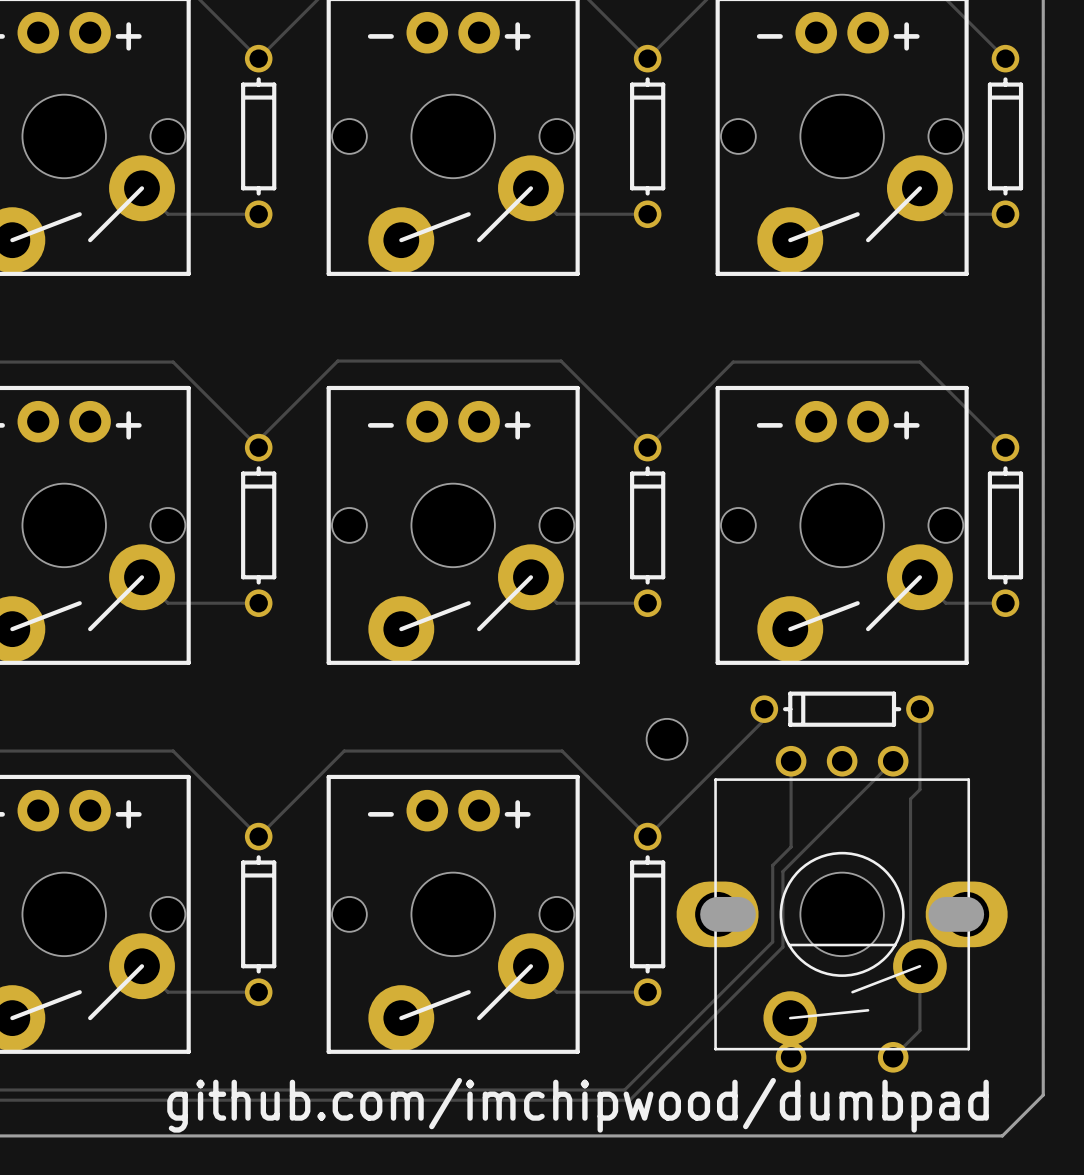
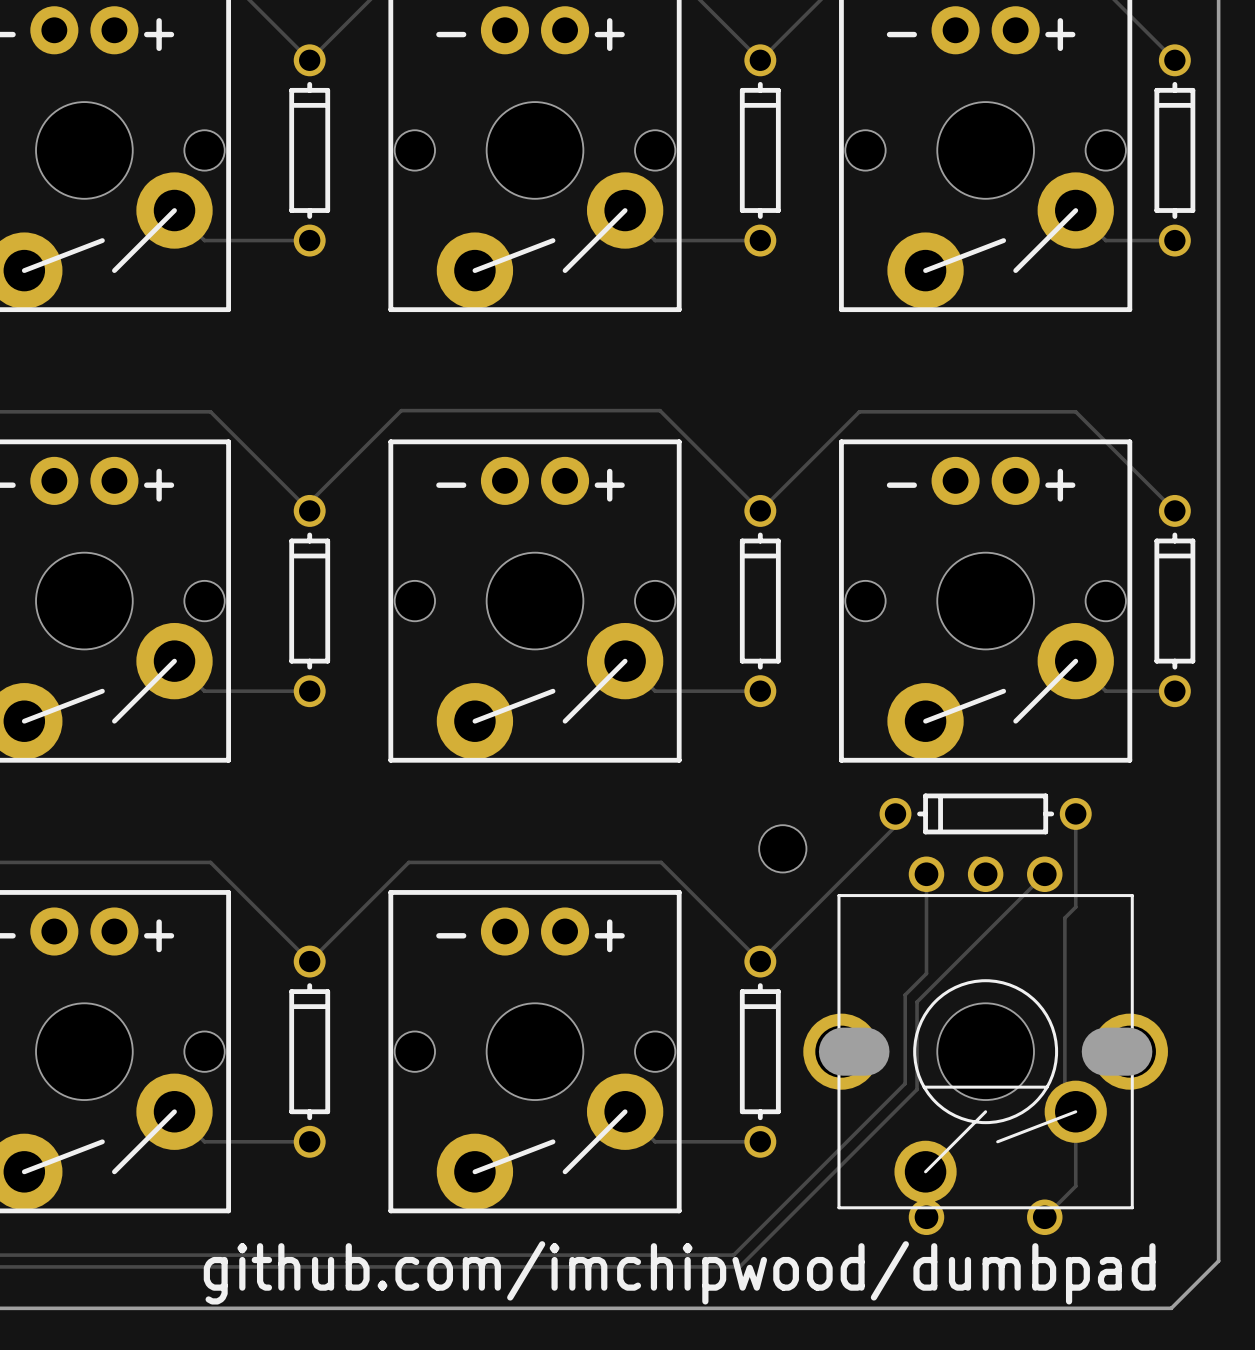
part footprint: [676, 745, 1008, 1073] -> [803, 856, 1168, 1235]

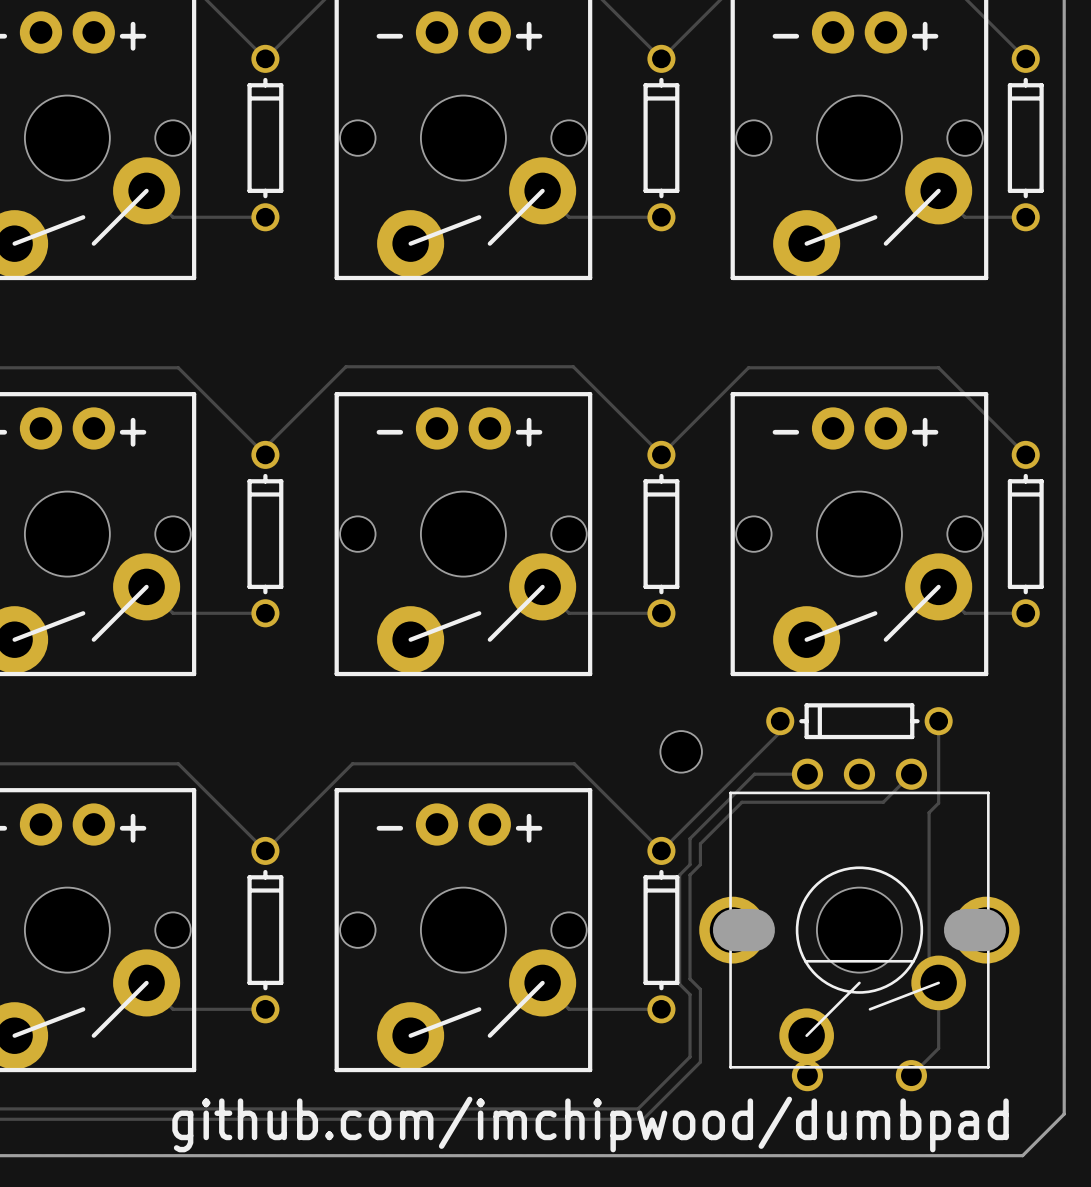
track: (926, 874) (926, 973) (905, 994) (905, 1083) (792, 1195) -> (807, 774) (754, 774) (690, 838) (690, 864) (679, 875) (679, 984) (690, 994) (690, 1056)
track: (1012, 906) (917, 1002) (917, 1089) (804, 1201) -> (883, 802) (741, 802) (700, 843) (700, 864) (690, 875) (690, 978) (700, 989) (700, 1062)

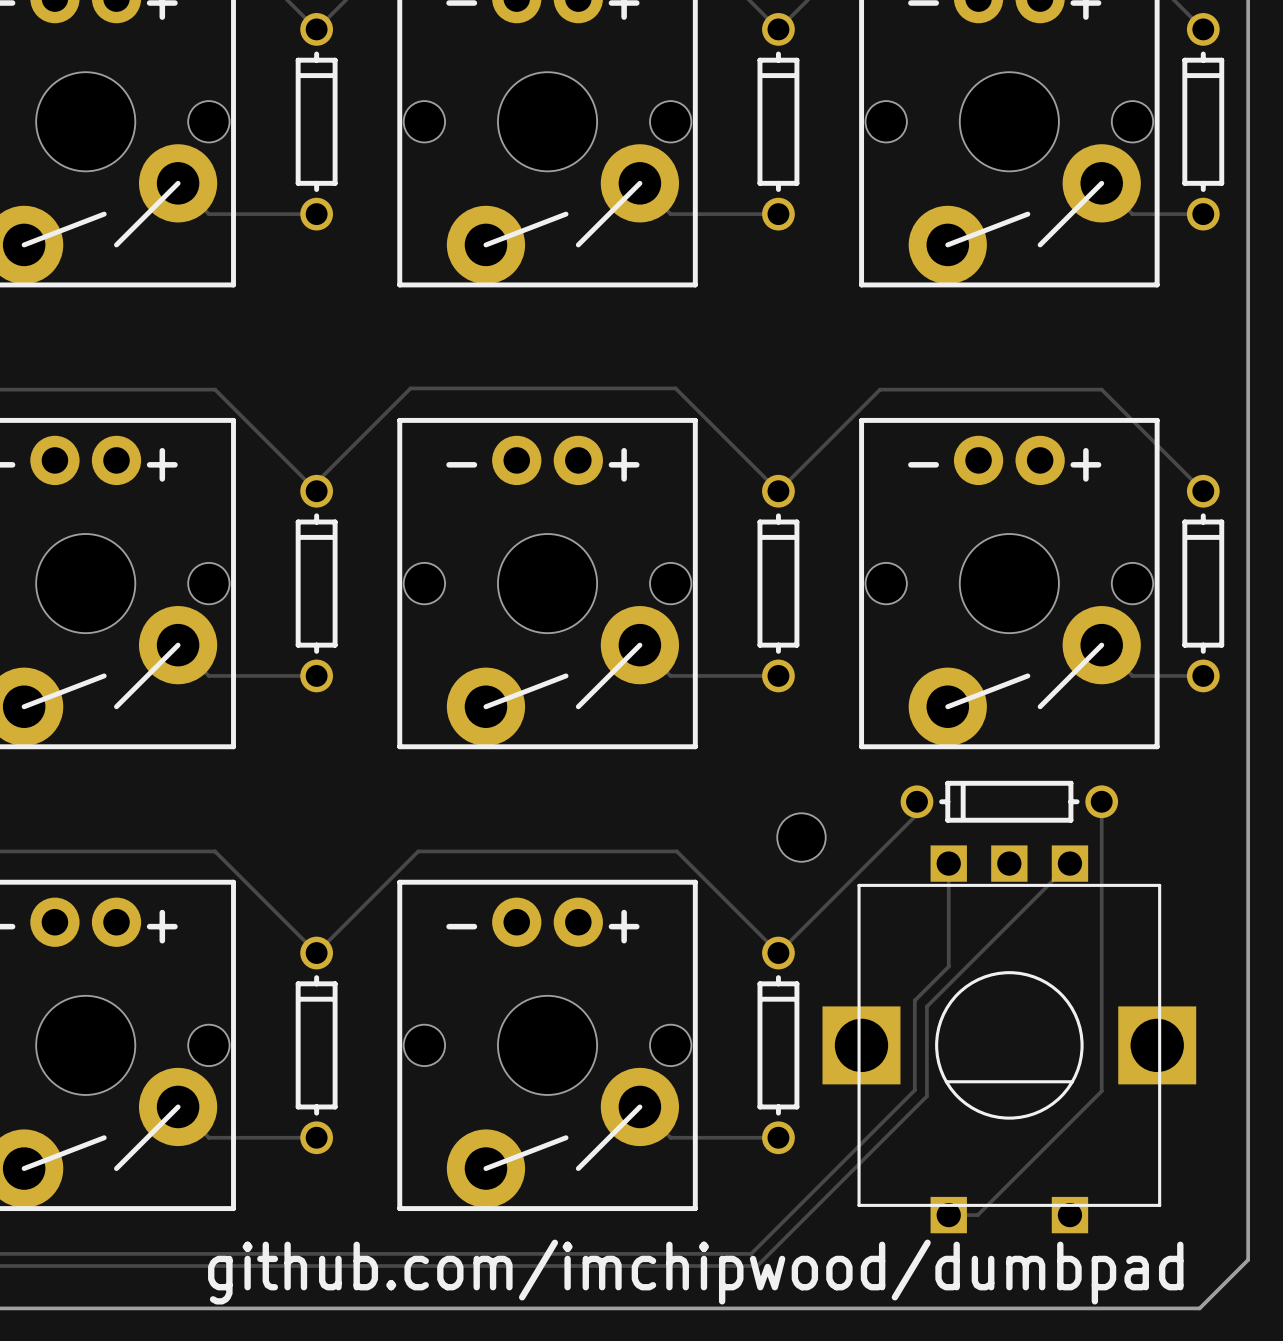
part footprint: [699, 758, 1020, 1092] -> [822, 845, 1197, 1234]
track: (807, 774) (754, 774) (690, 838) (690, 864) (679, 875) (679, 984) (690, 994) (690, 1056) -> (948, 863) (948, 966) (914, 1000) (914, 1090) (811, 1193)
track: (883, 802) (741, 802) (700, 843) (700, 864) (690, 875) (690, 978) (700, 989) (700, 1062) -> (1037, 896) (926, 1006) (926, 1096) (823, 1199)
track: (938, 803) (929, 812) (929, 973) (938, 982) (938, 1048) (911, 1075) -> (1101, 897) (1101, 1091) (977, 1215) (948, 1215)

